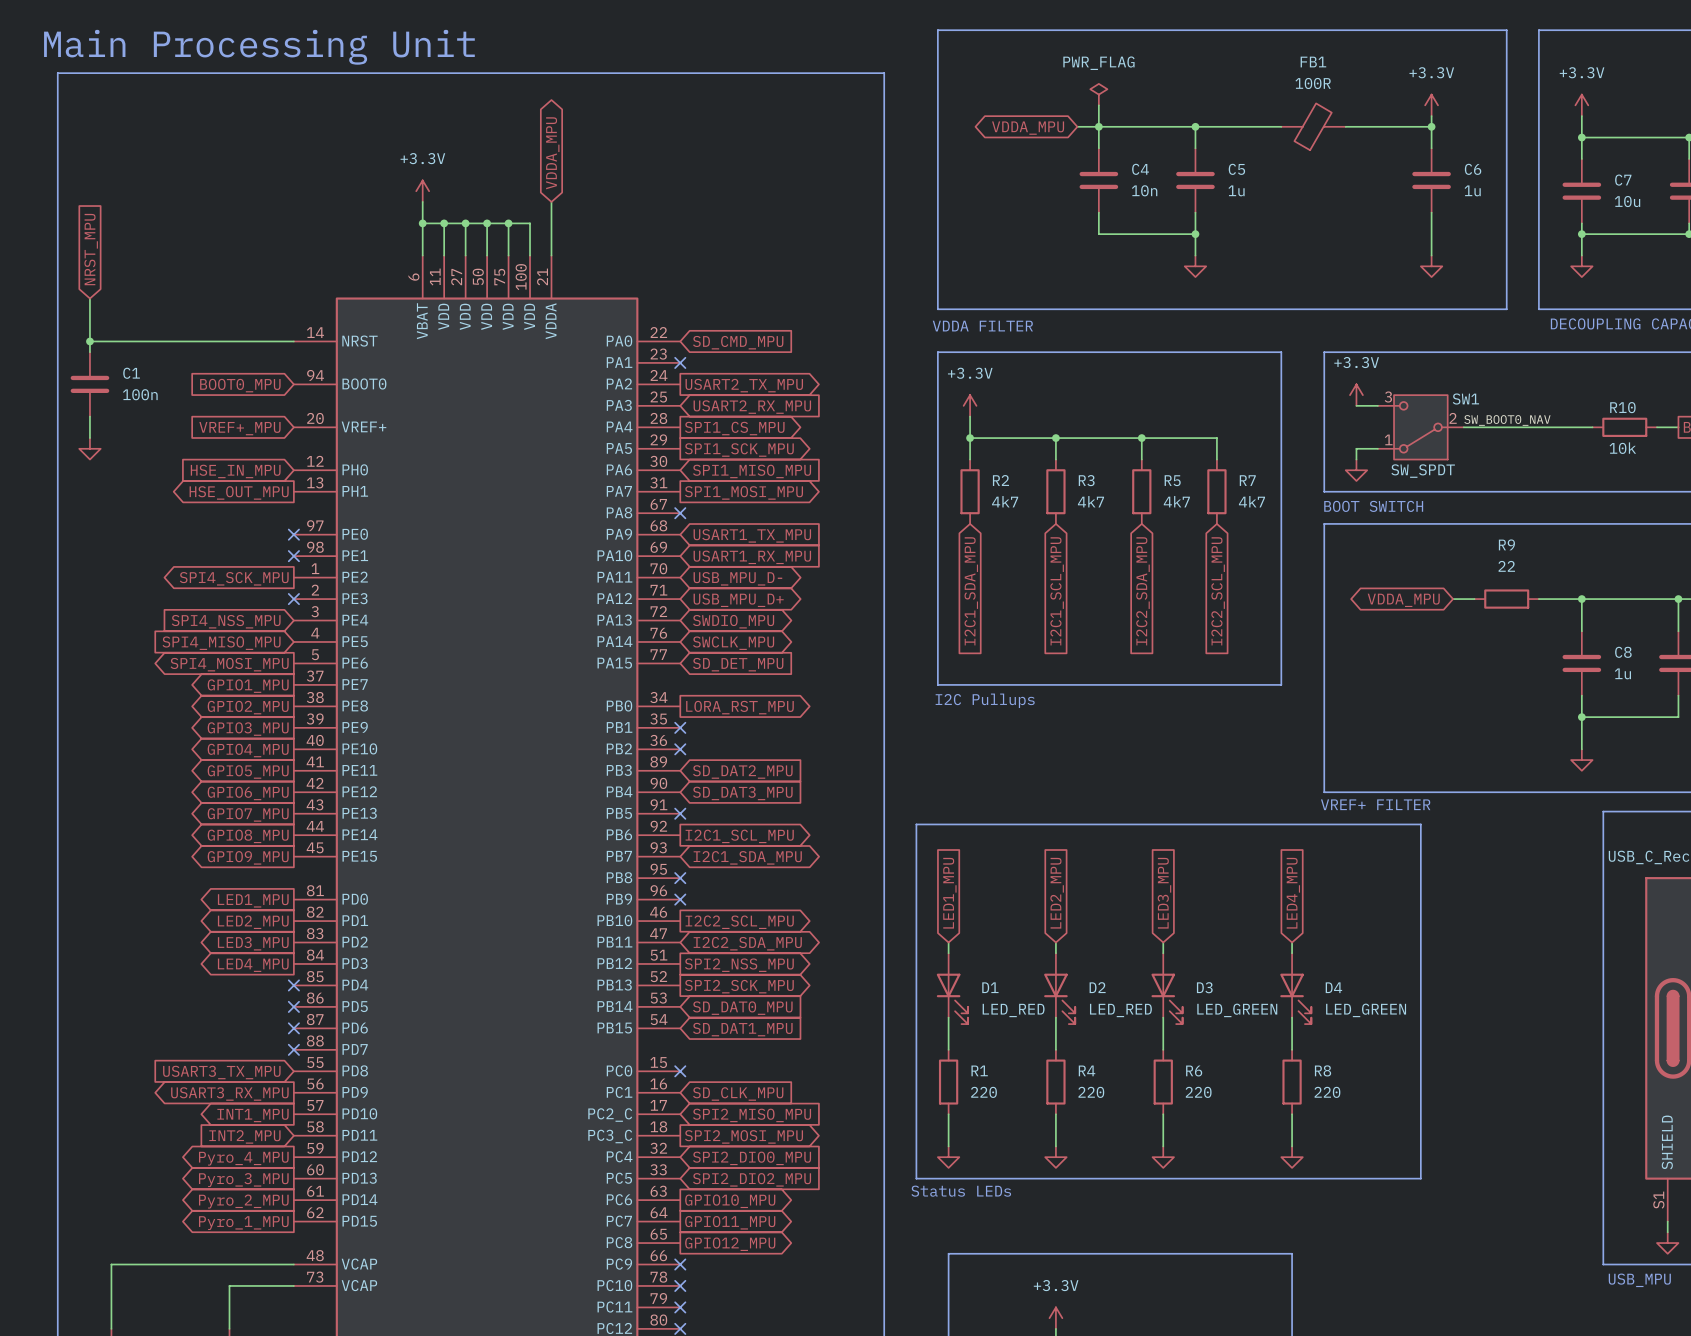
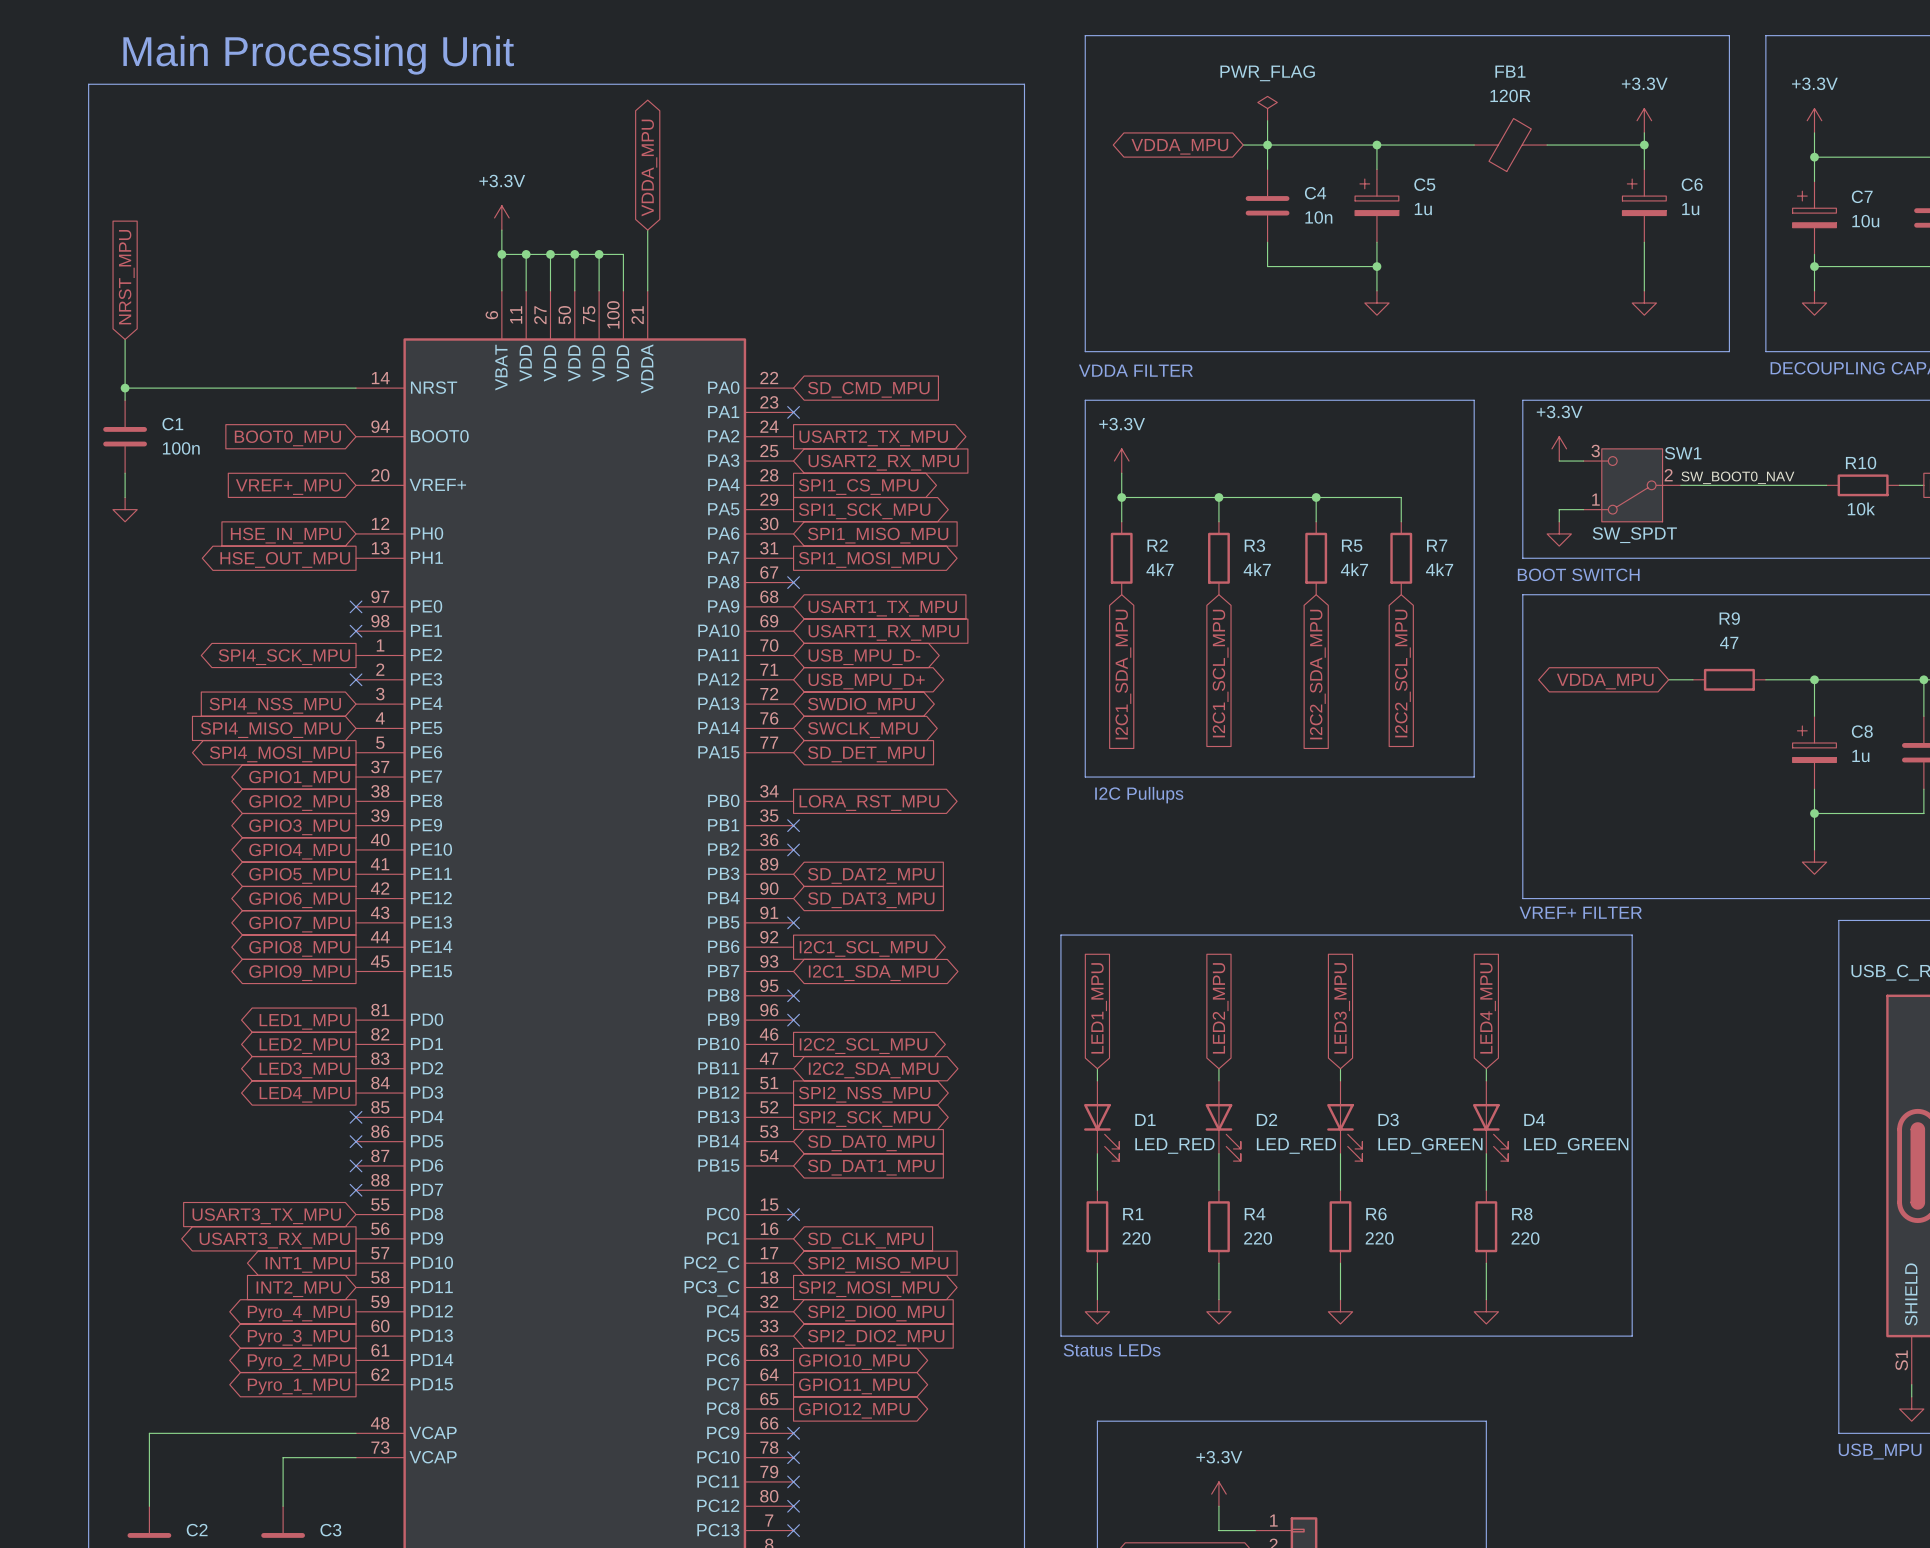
FB1 value: 100R (1313, 83) -> 120R (1510, 95)
C5 symbol: [1176, 148, 1215, 213] -> [1355, 169, 1399, 243]
C6 symbol: [1412, 148, 1451, 213] -> [1622, 169, 1667, 243]
C7 symbol: [1562, 159, 1602, 224] -> [1792, 181, 1837, 255]
R9 value: 22 (1506, 566) -> 47 (1729, 642)
C8 symbol: [1562, 631, 1602, 696] -> [1792, 716, 1837, 790]

